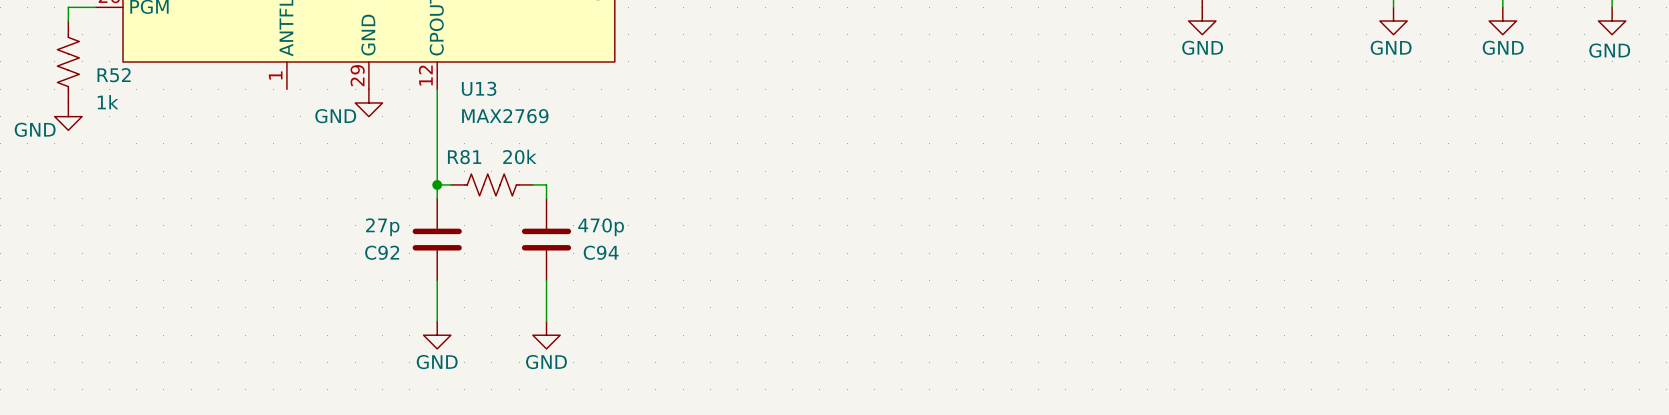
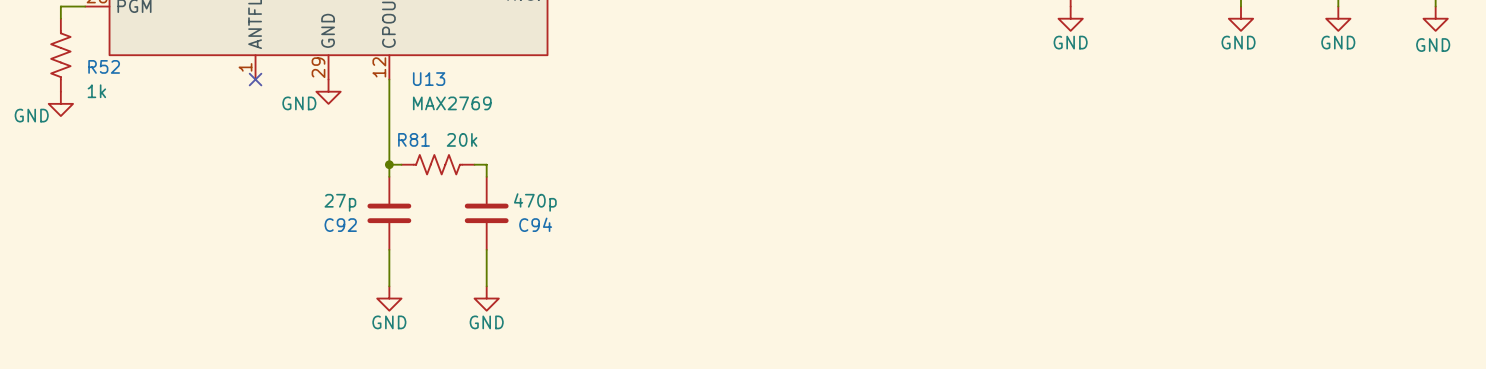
no-connect mark: none -> (255, 79)

